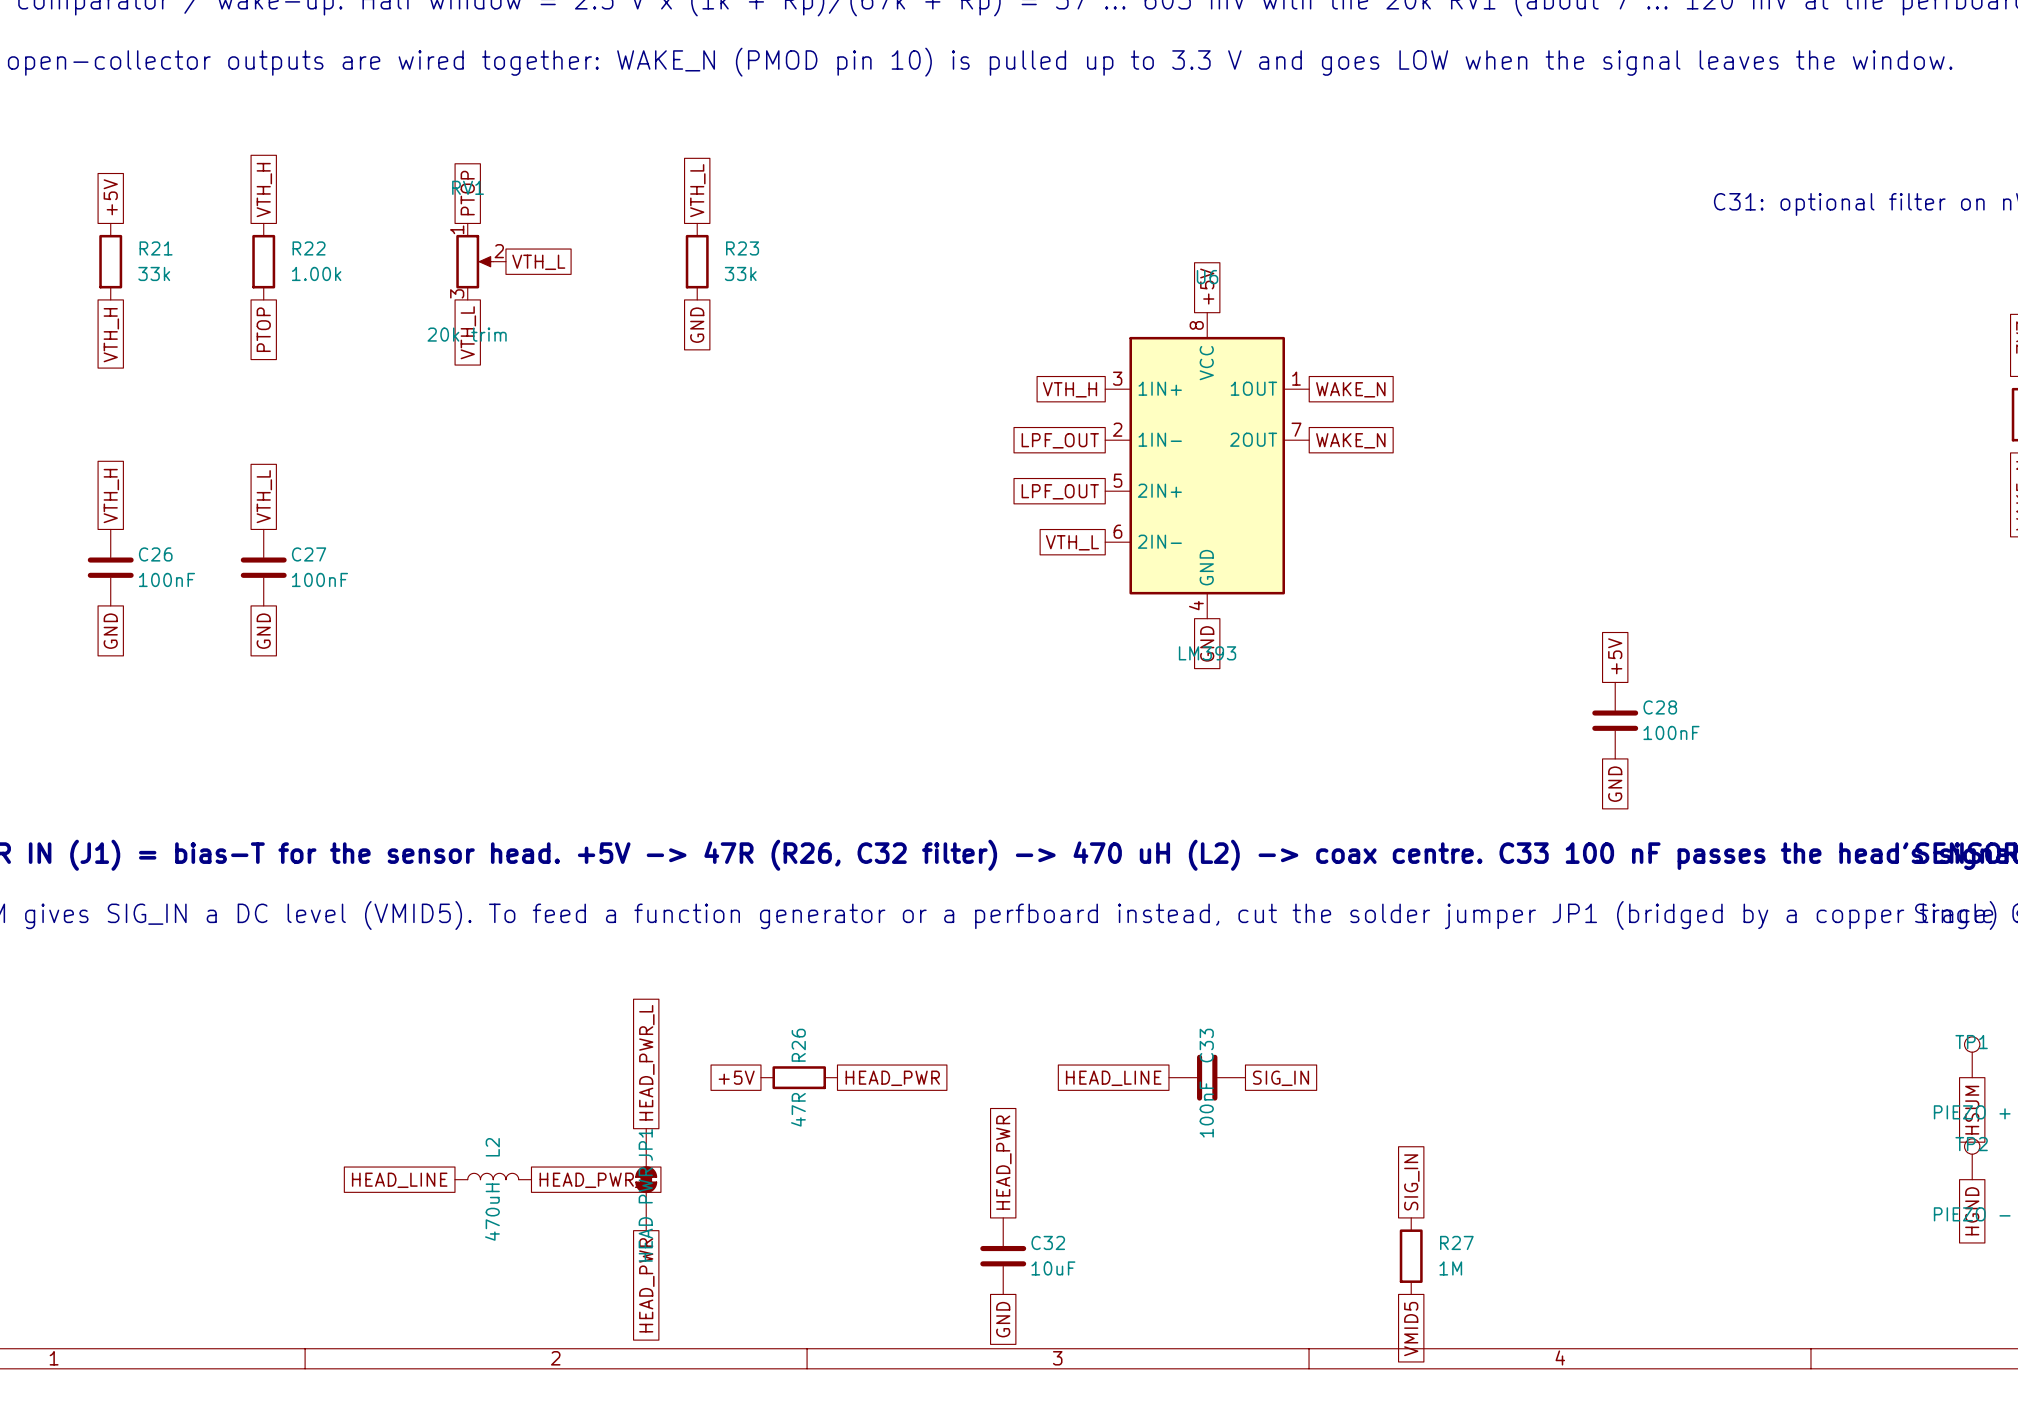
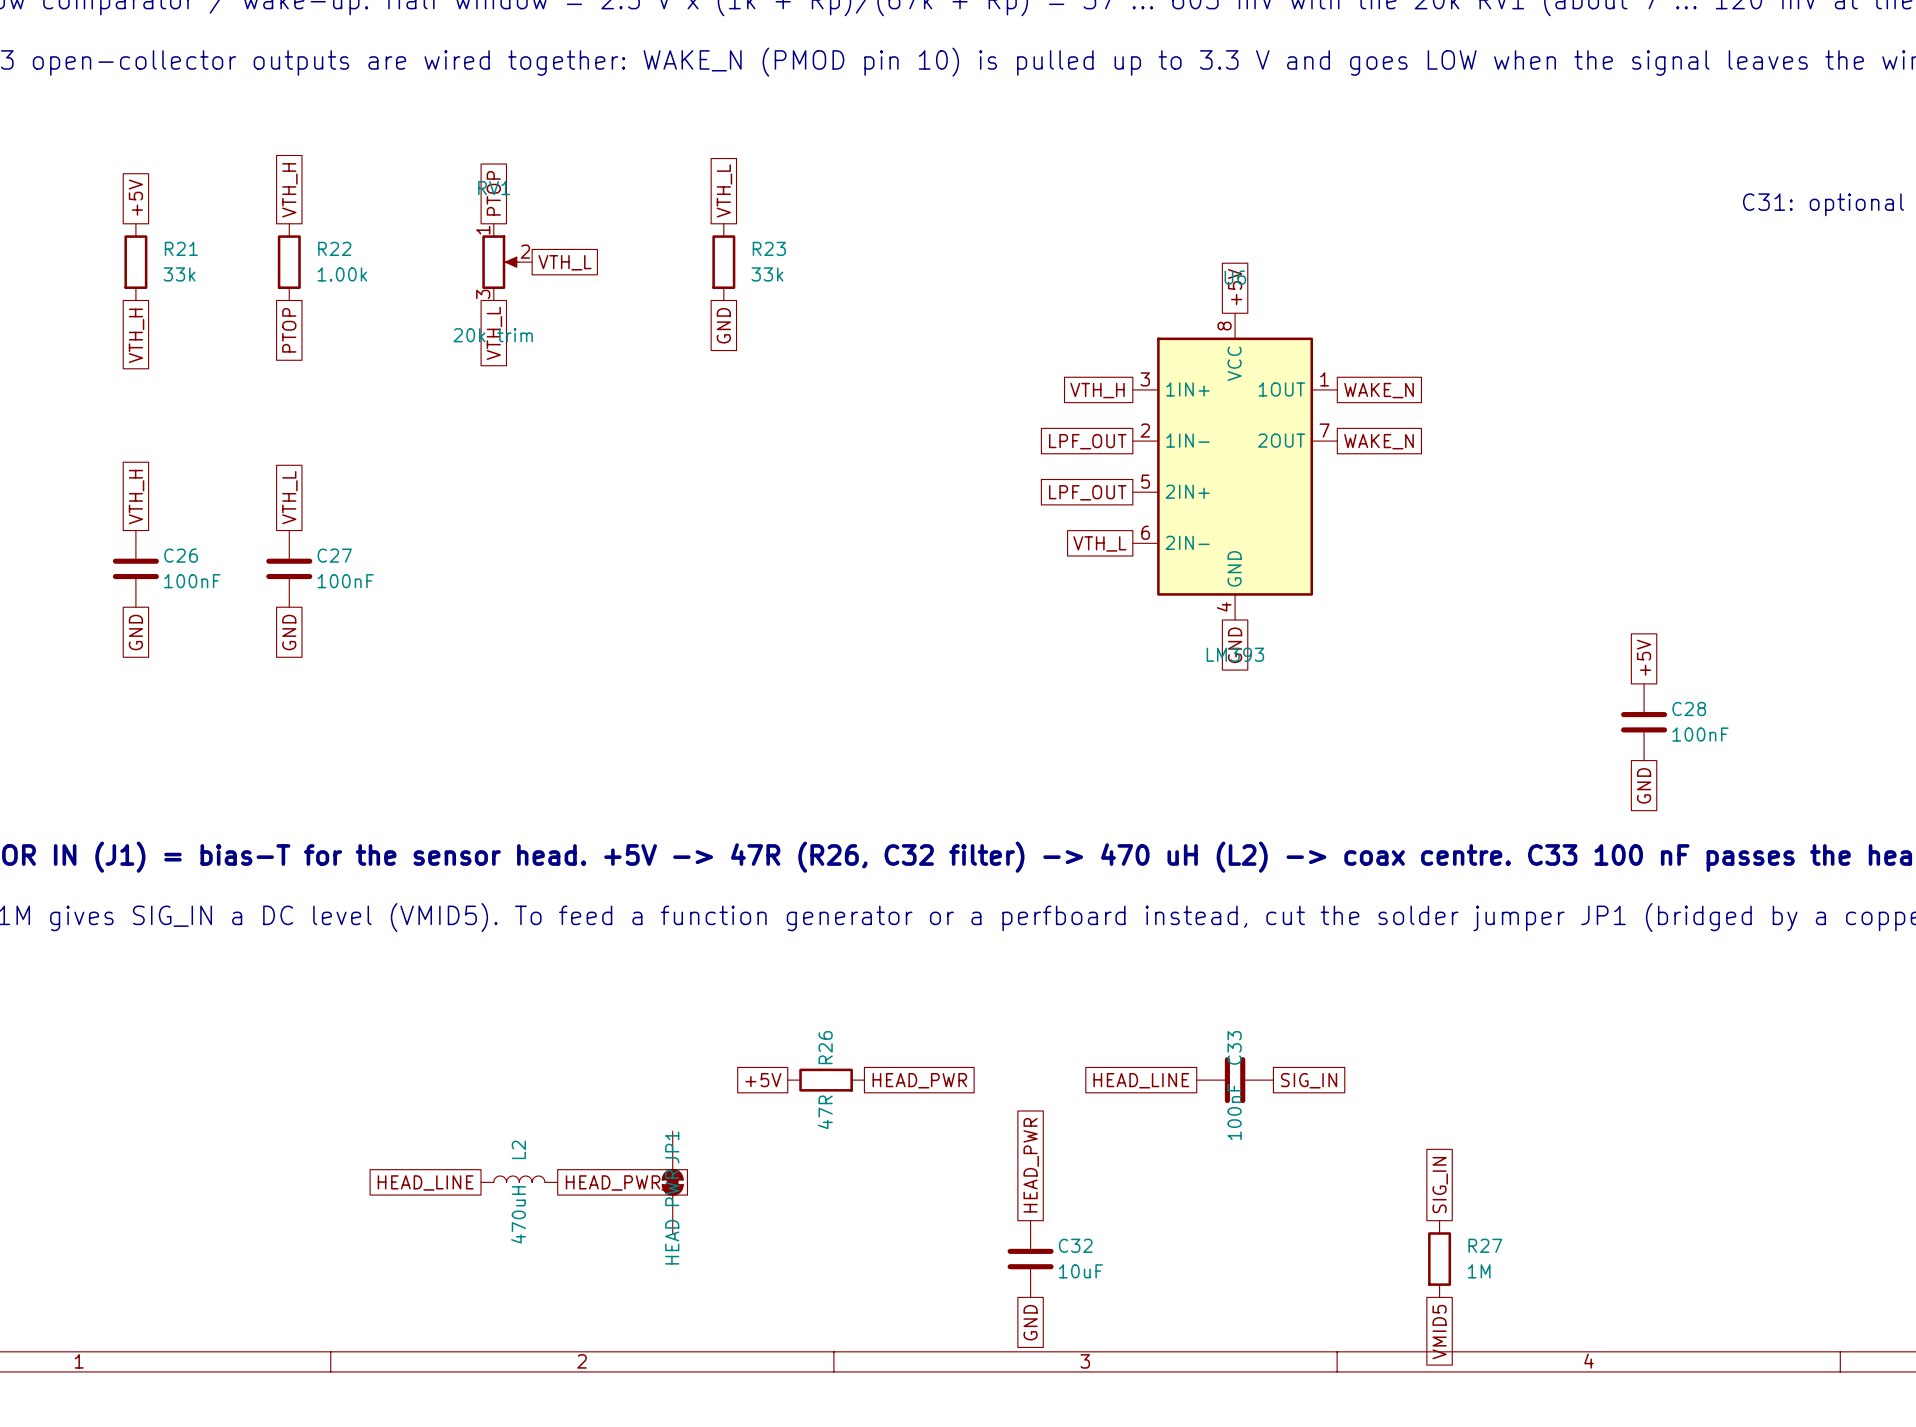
global label: HEAD_PWR_L (646, 1062) -> none
global label: HEAD_PWR (646, 1285) -> none

